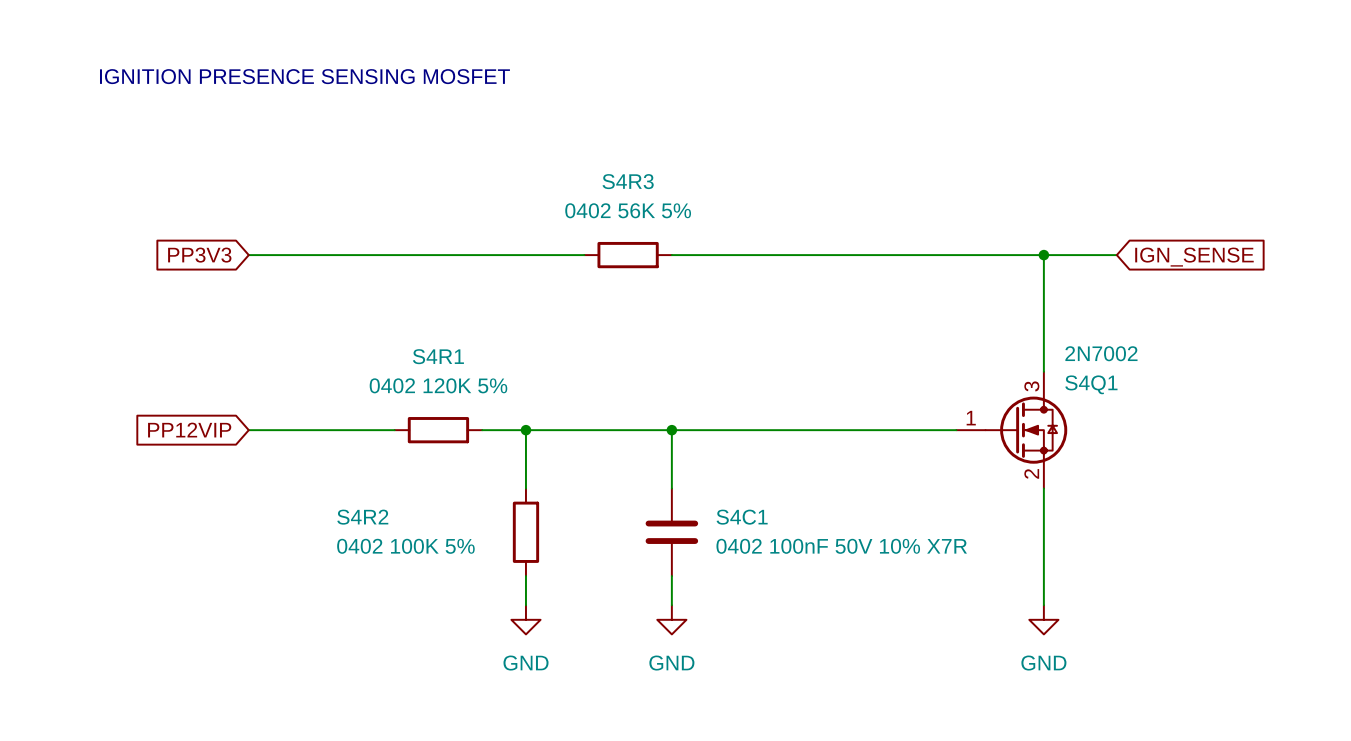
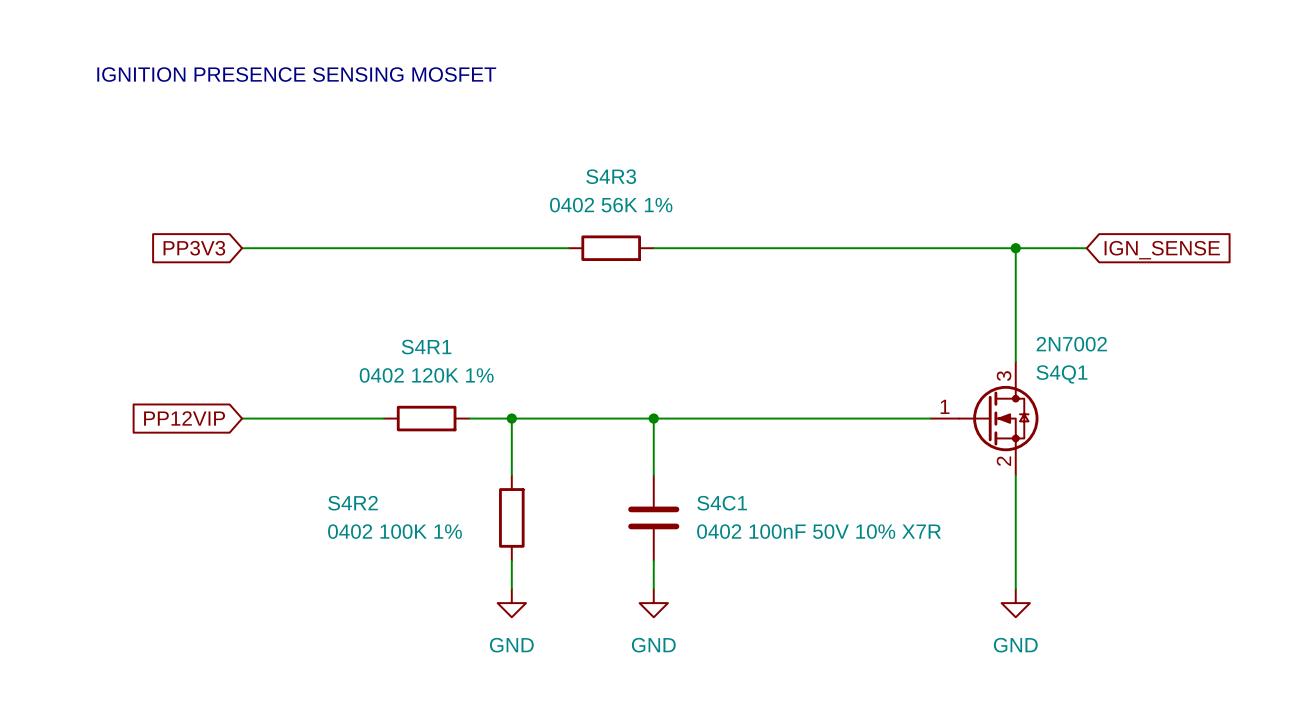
S4R3 value: 0402 56K 5% (628, 210) -> 0402 56K 1% (611, 205)
S4R1 value: 0402 120K 5% (438, 385) -> 0402 120K 1% (426, 375)
S4R2 value: 0402 100K 5% (405, 546) -> 0402 100K 1% (394, 531)

